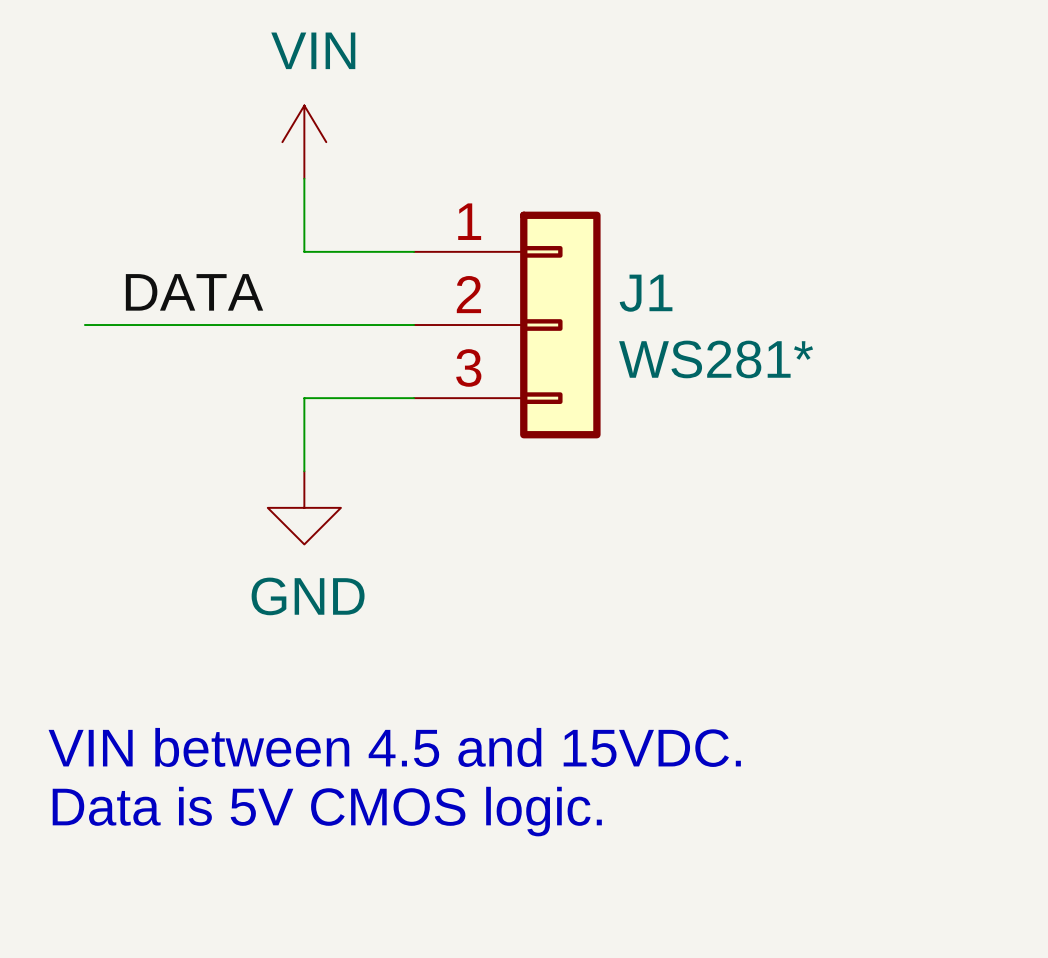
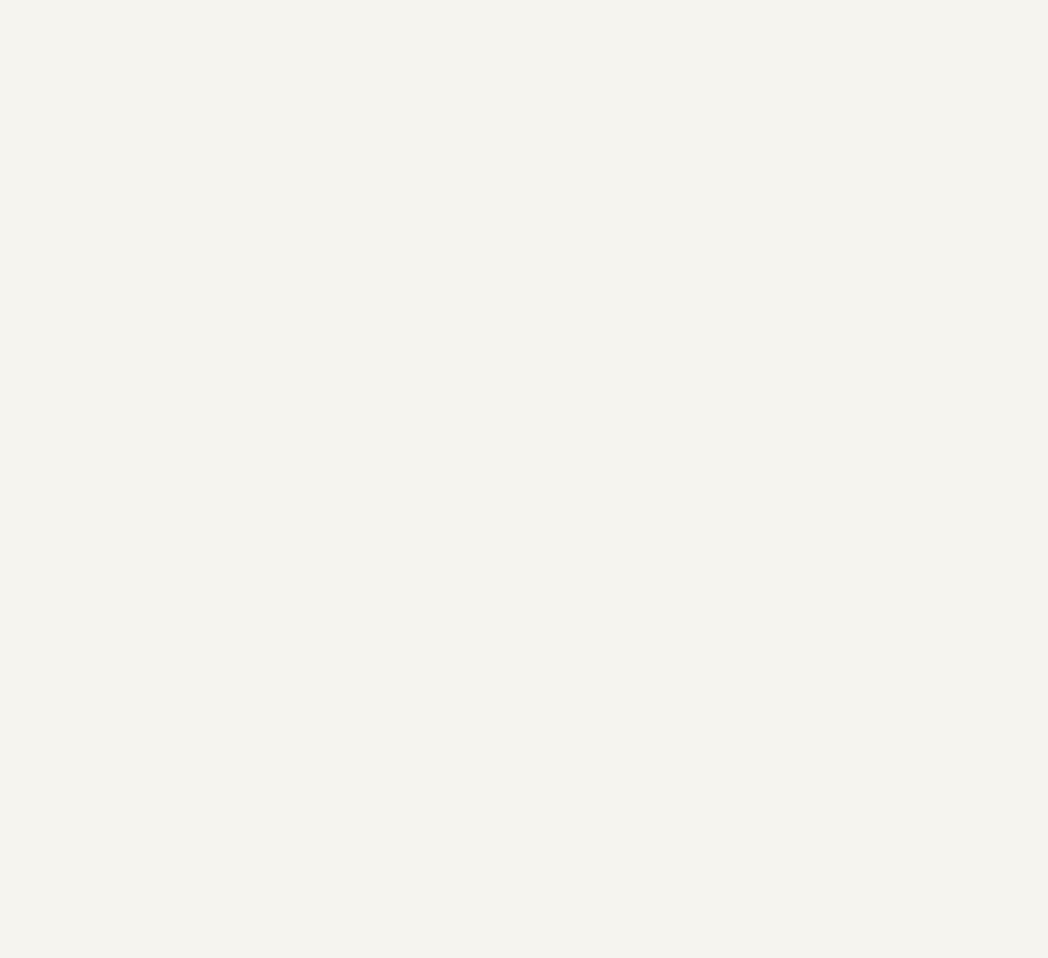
power symbol: VIN (304, 142) -> none
wire: (304, 178) (304, 251) (414, 251) -> none
label: DATA (194, 292) -> none
wire: (84, 325) (414, 325) -> none
J1: WS281* (507, 325) -> none
wire: (414, 398) (304, 398) (304, 471) -> none
power symbol: GND (304, 507) -> none
text: VIN between 4.5 and 15VDC. (394, 747) -> none
text: Data is 5V CMOS logic. (327, 811) -> none

